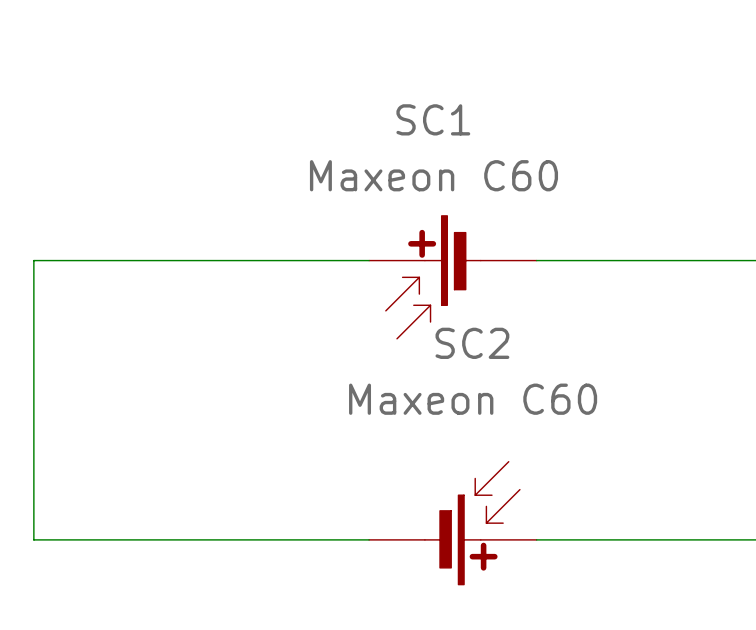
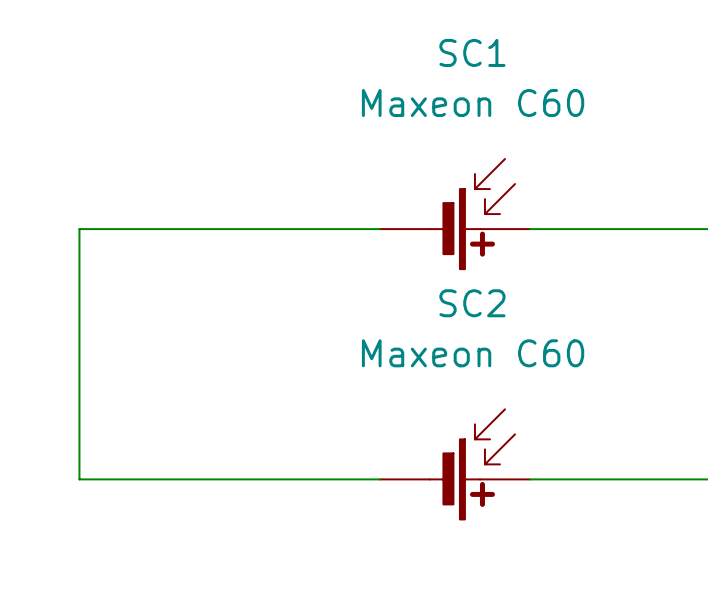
SC1 name position: SC1 (433, 119) -> SC1 (472, 52)
SC1 value position: Maxeon C60 (433, 175) -> Maxeon C60 (473, 103)
SC1 rotation: 0° (433, 277) -> 180° (472, 214)

